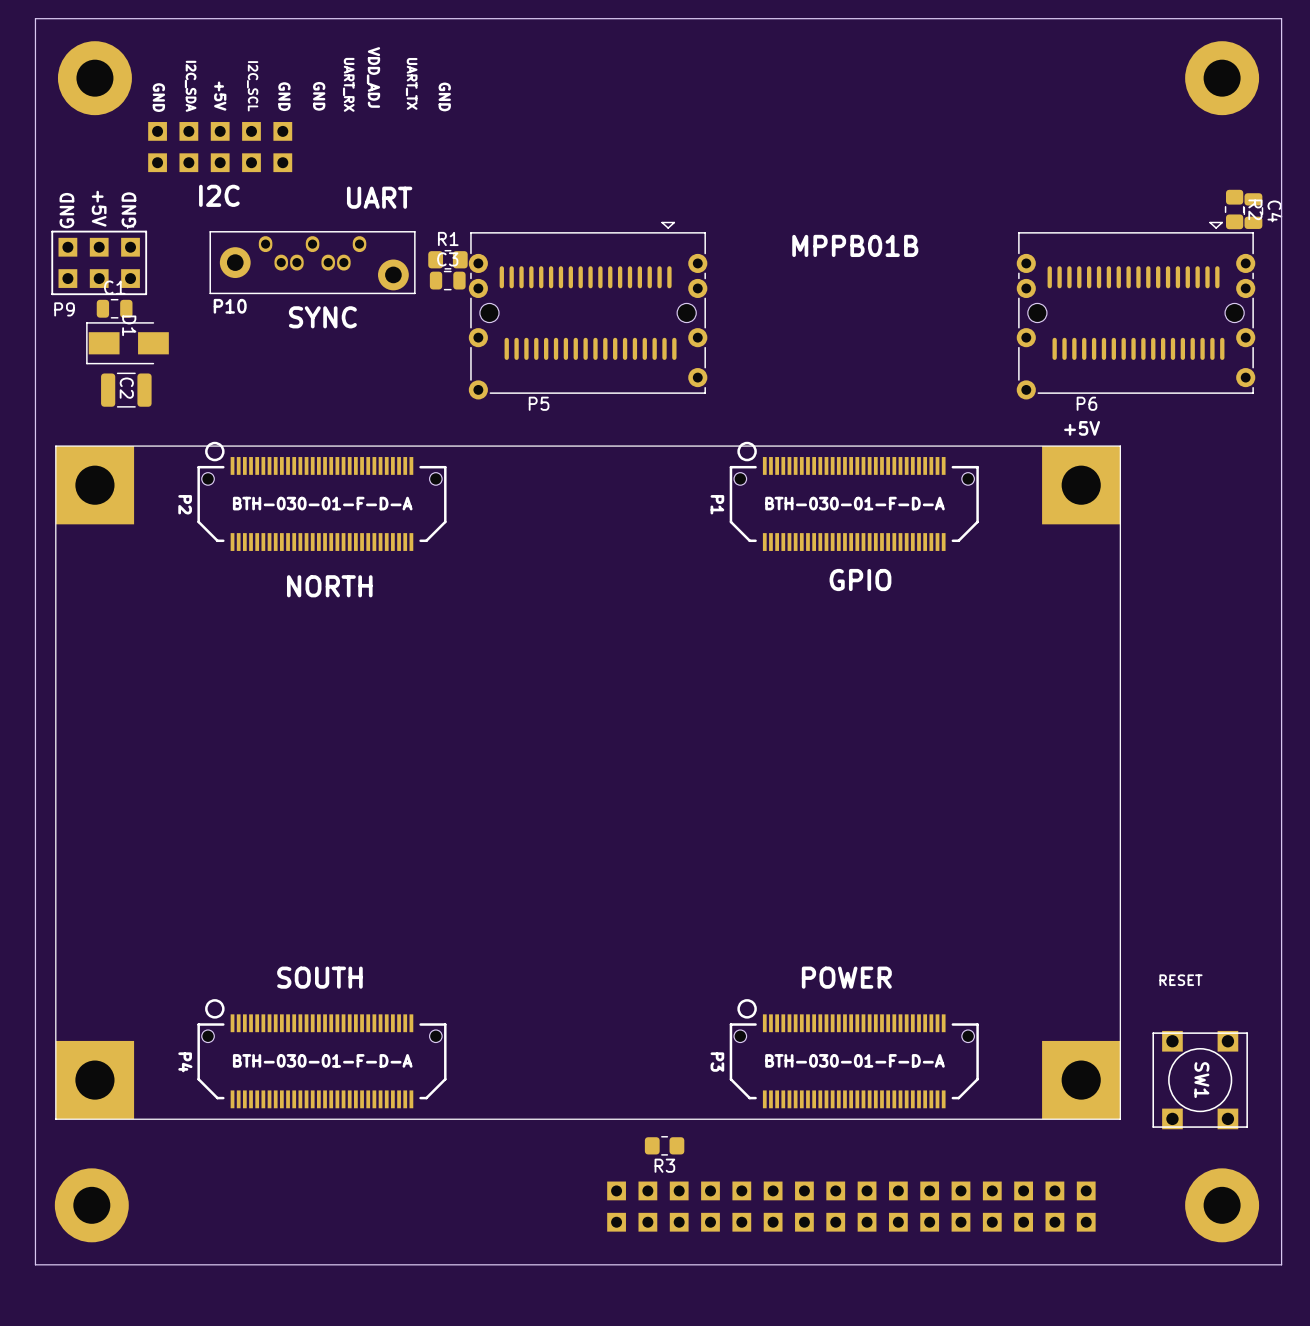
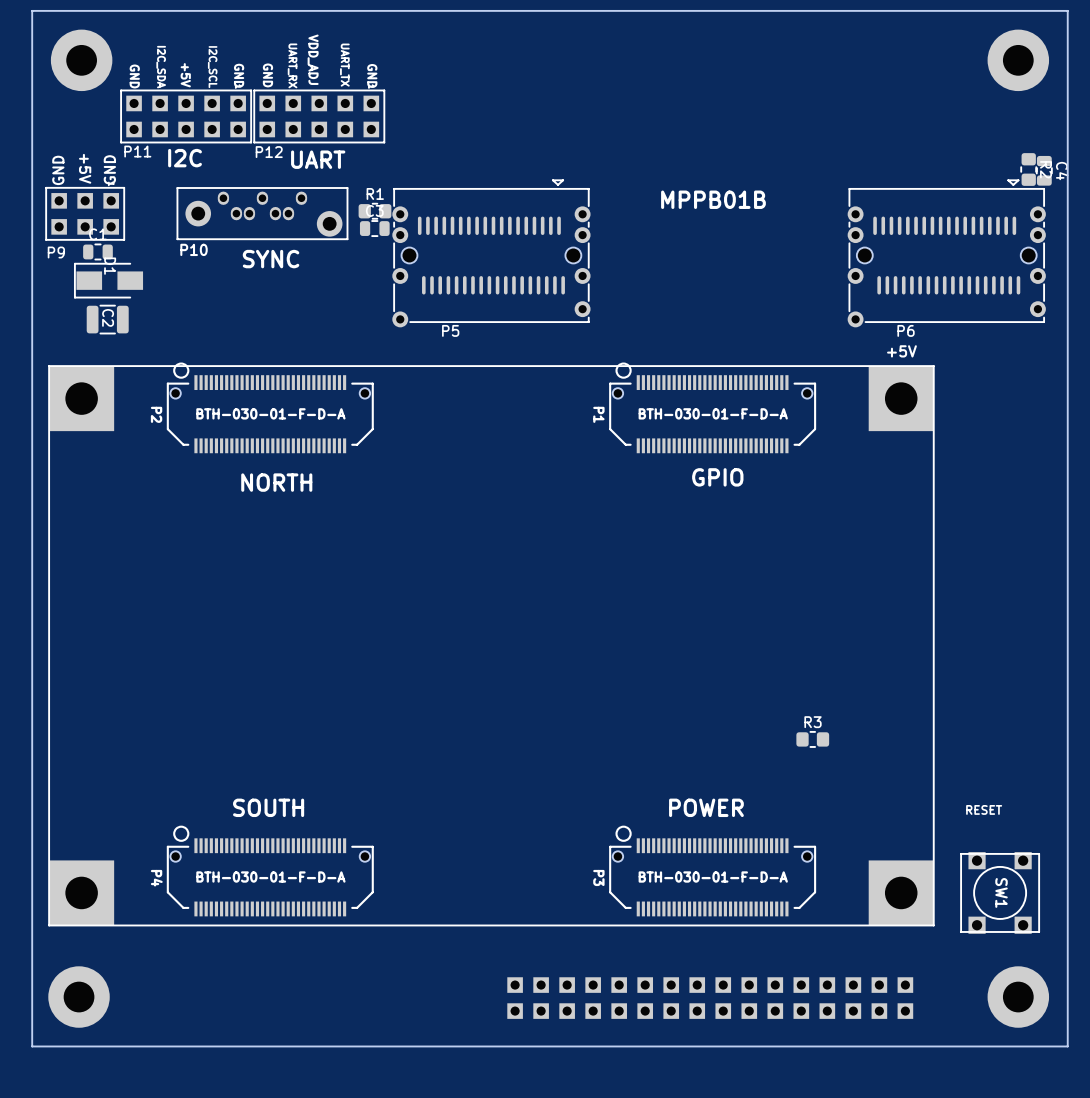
P11: none -> (186, 116)
P12: none -> (319, 116)
part: (220, 147) -> none
R3 position: (664, 1145) -> (812, 739)
R3 name position: R3 (664, 1165) -> R3 (813, 722)

